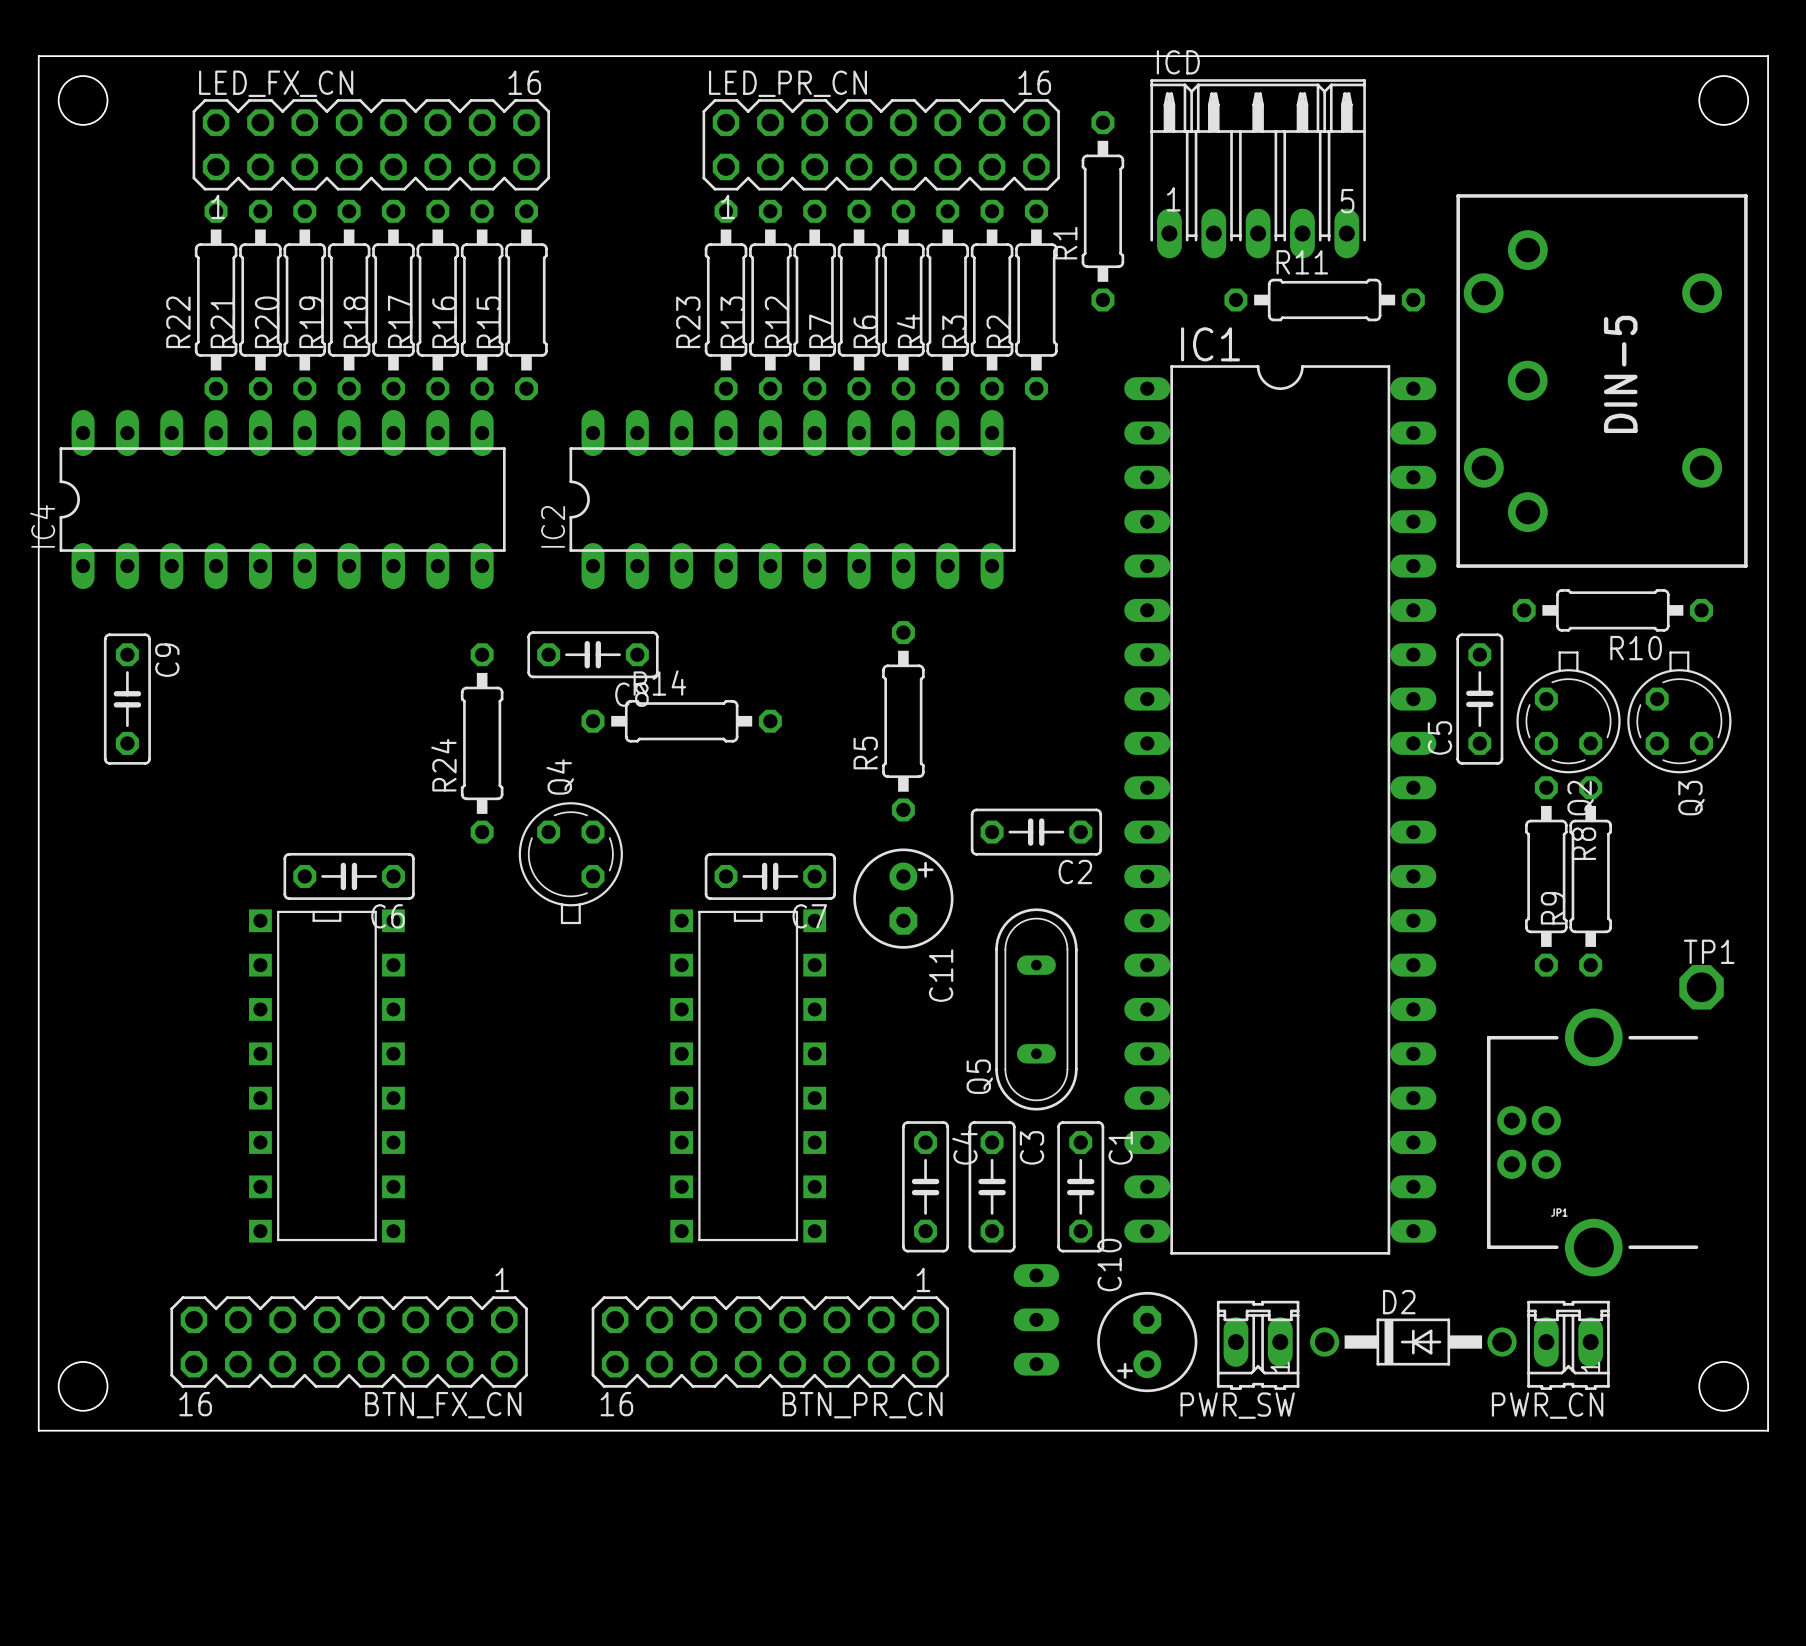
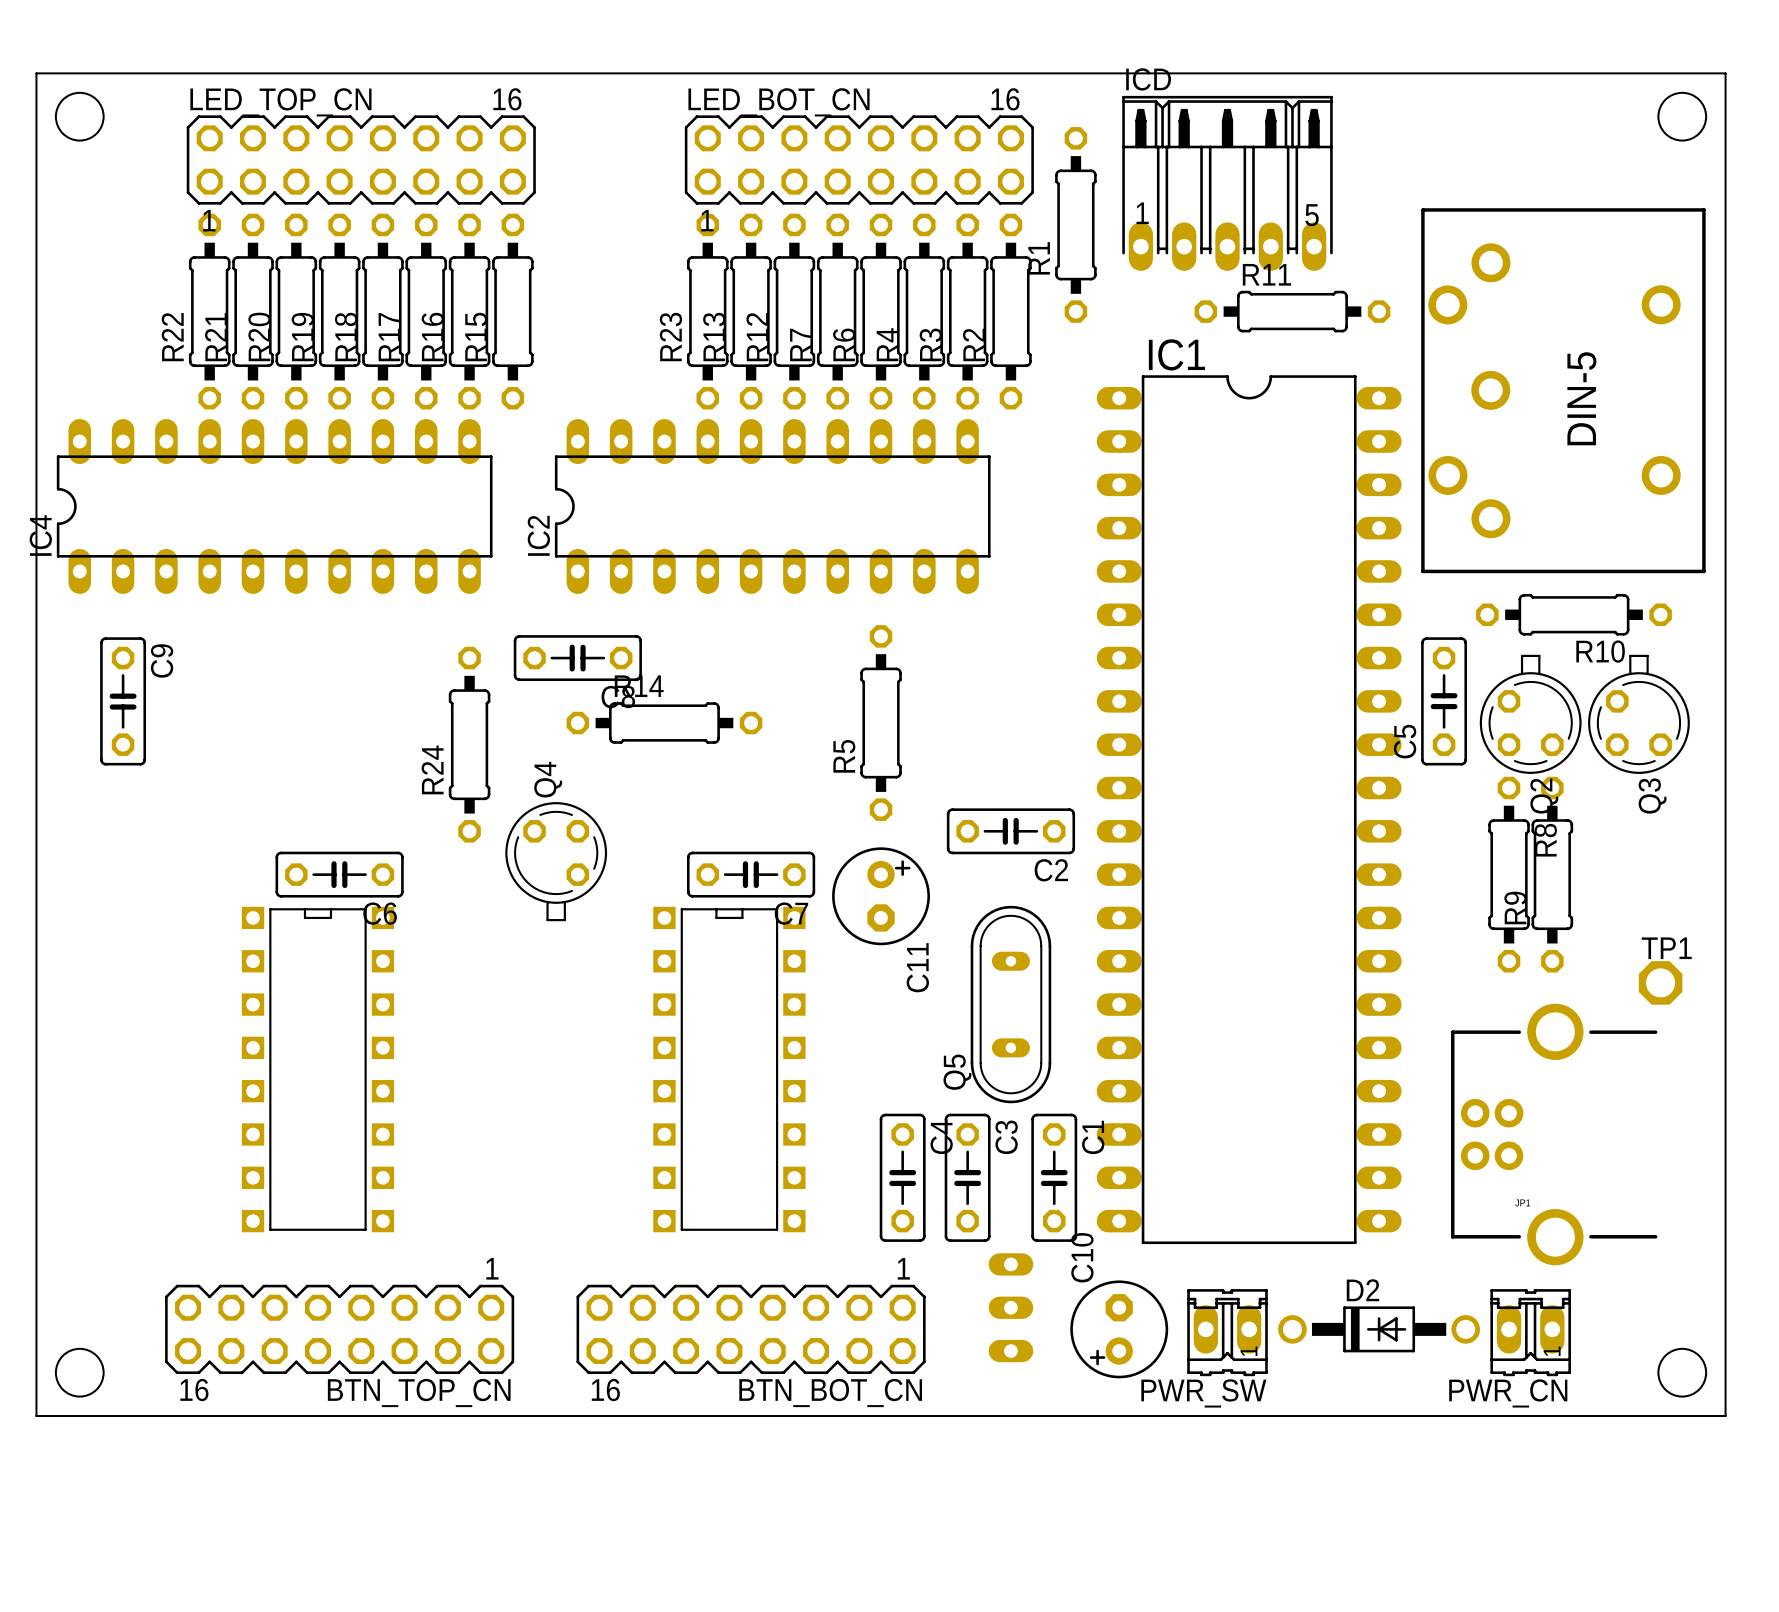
LED_FX_CN name: LED_FX_CN (276, 83) -> LED_TOP_CN (280, 102)
LED_PR_CN name: LED_PR_CN (787, 83) -> LED_BOT_CN (779, 102)
BTN_FX_CN name: BTN_FX_CN (443, 1405) -> BTN_TOP_CN (419, 1392)
BTN_PR_CN name: BTN_PR_CN (862, 1405) -> BTN_BOT_CN (830, 1392)

